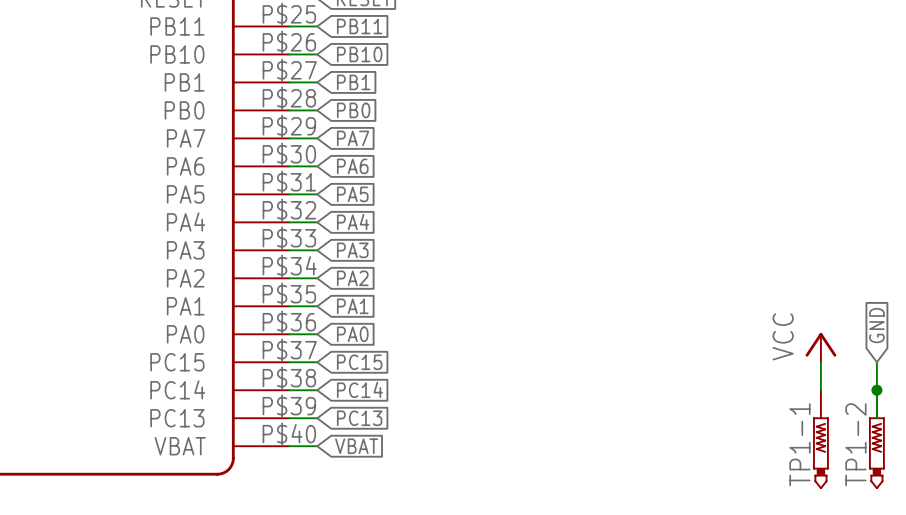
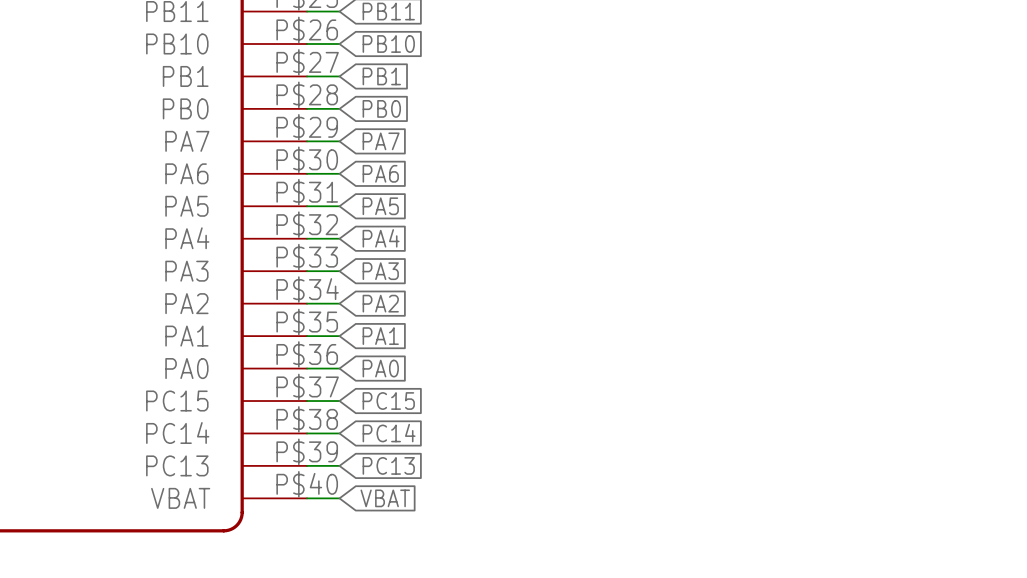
global label: GND (876, 325) -> none
power symbol: VCC (820, 347) -> none
wire: (820, 362) (820, 390) -> none
wire: (876, 362) (876, 418) -> none
junction: (876, 390) -> none
TP1-1: (820, 439) -> none
TP1-2: (876, 439) -> none

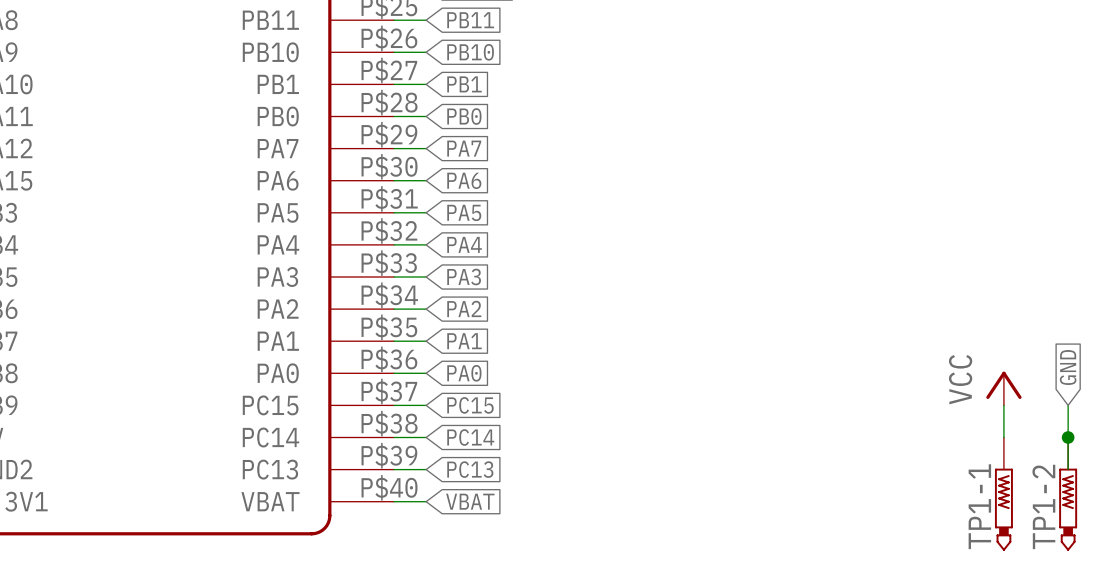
global label: none -> GND (1068, 367)
power symbol: none -> VCC (1003, 388)
wire: none -> (1003, 405) (1003, 437)
wire: none -> (1068, 405) (1068, 469)
junction: none -> (1068, 437)
TP1-1: none -> (1003, 494)
TP1-2: none -> (1068, 494)

